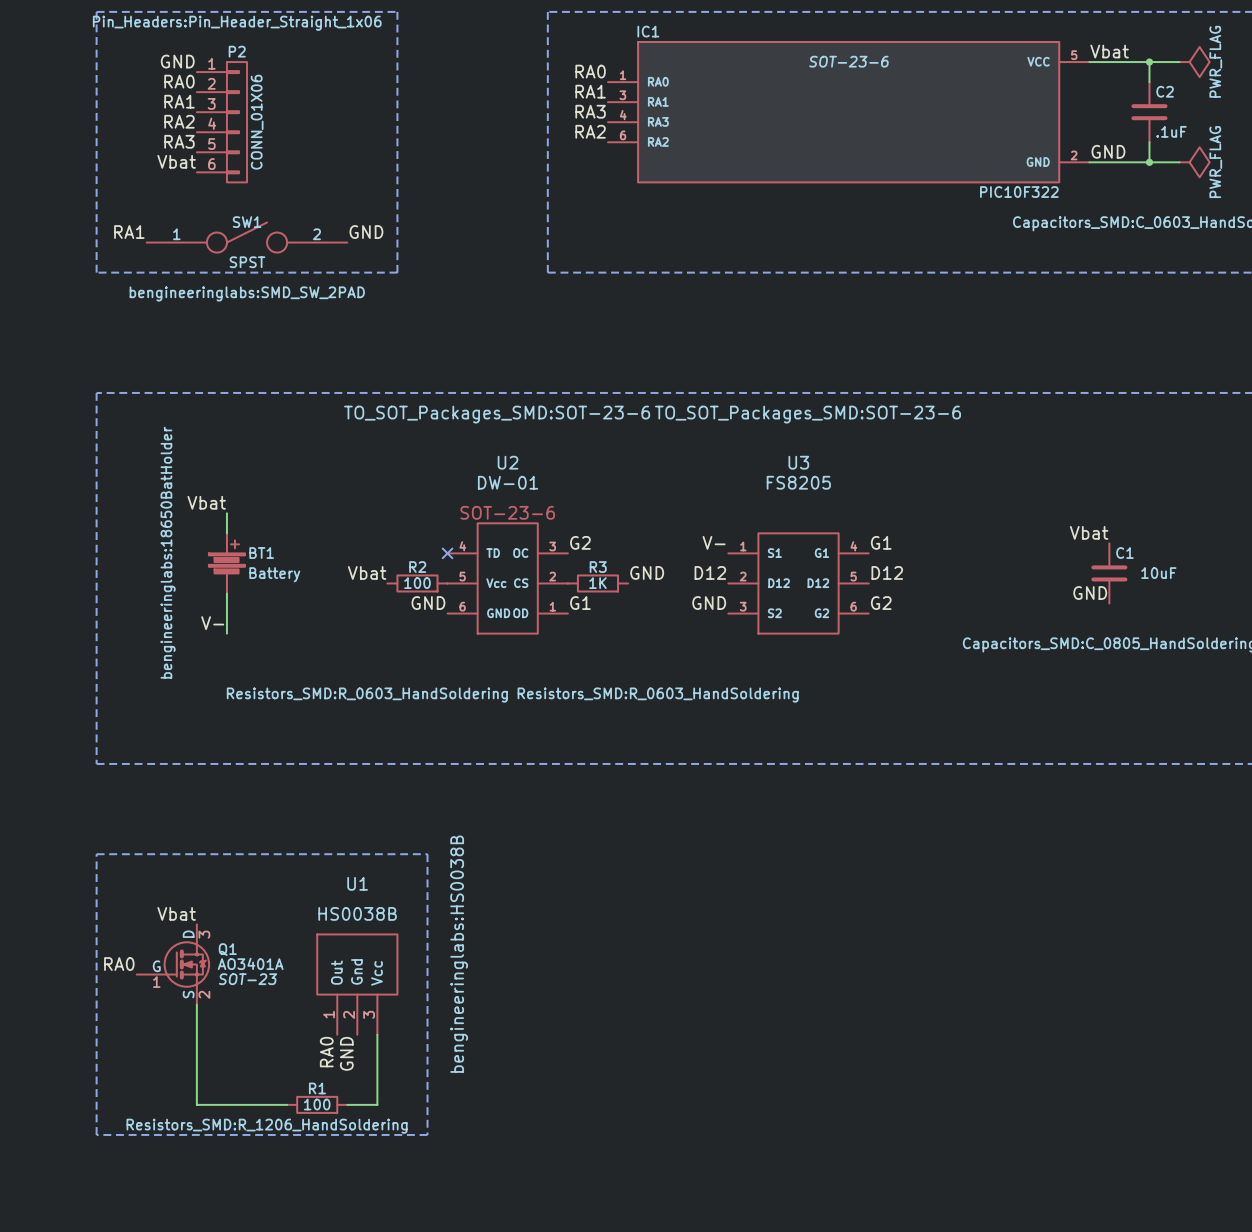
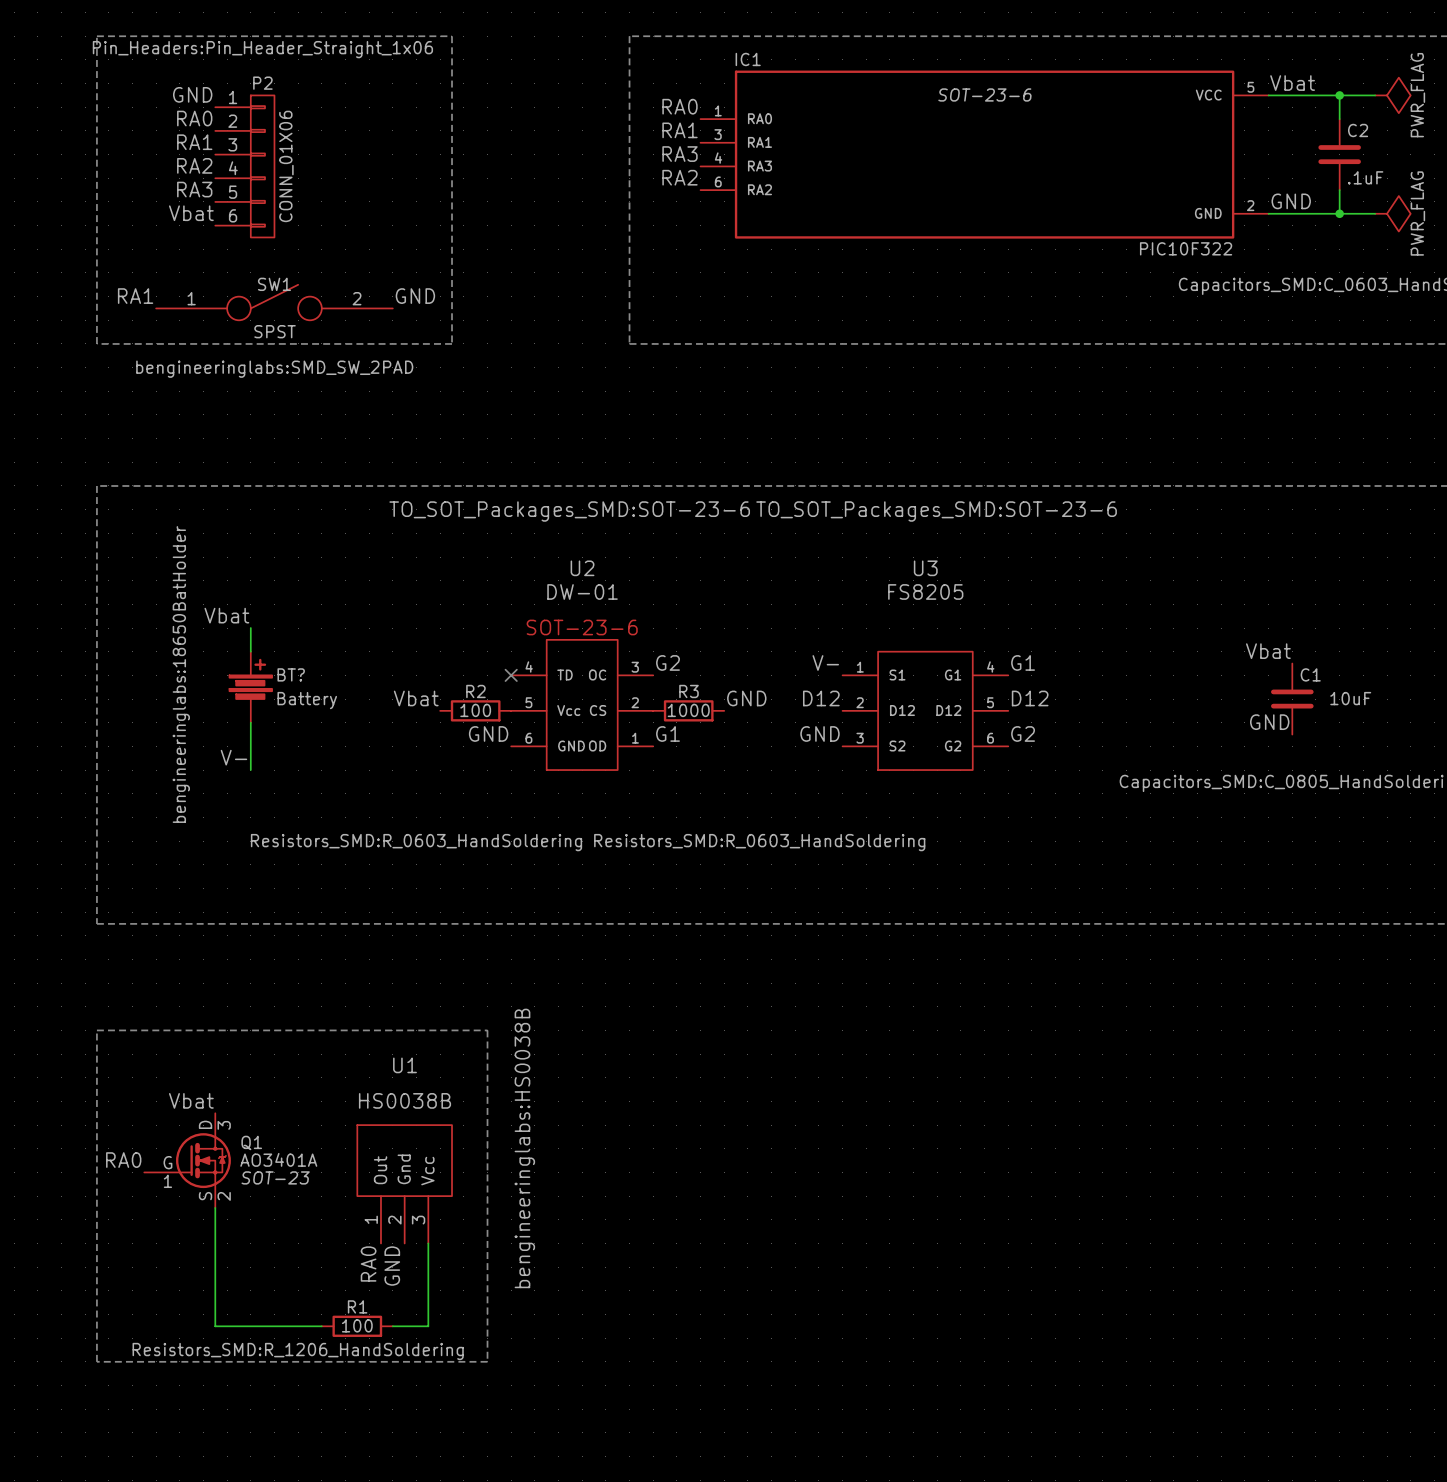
BT1 name: BT1 (261, 553) -> BT? (291, 674)
R3 value: 1K (597, 583) -> 1000 (688, 710)

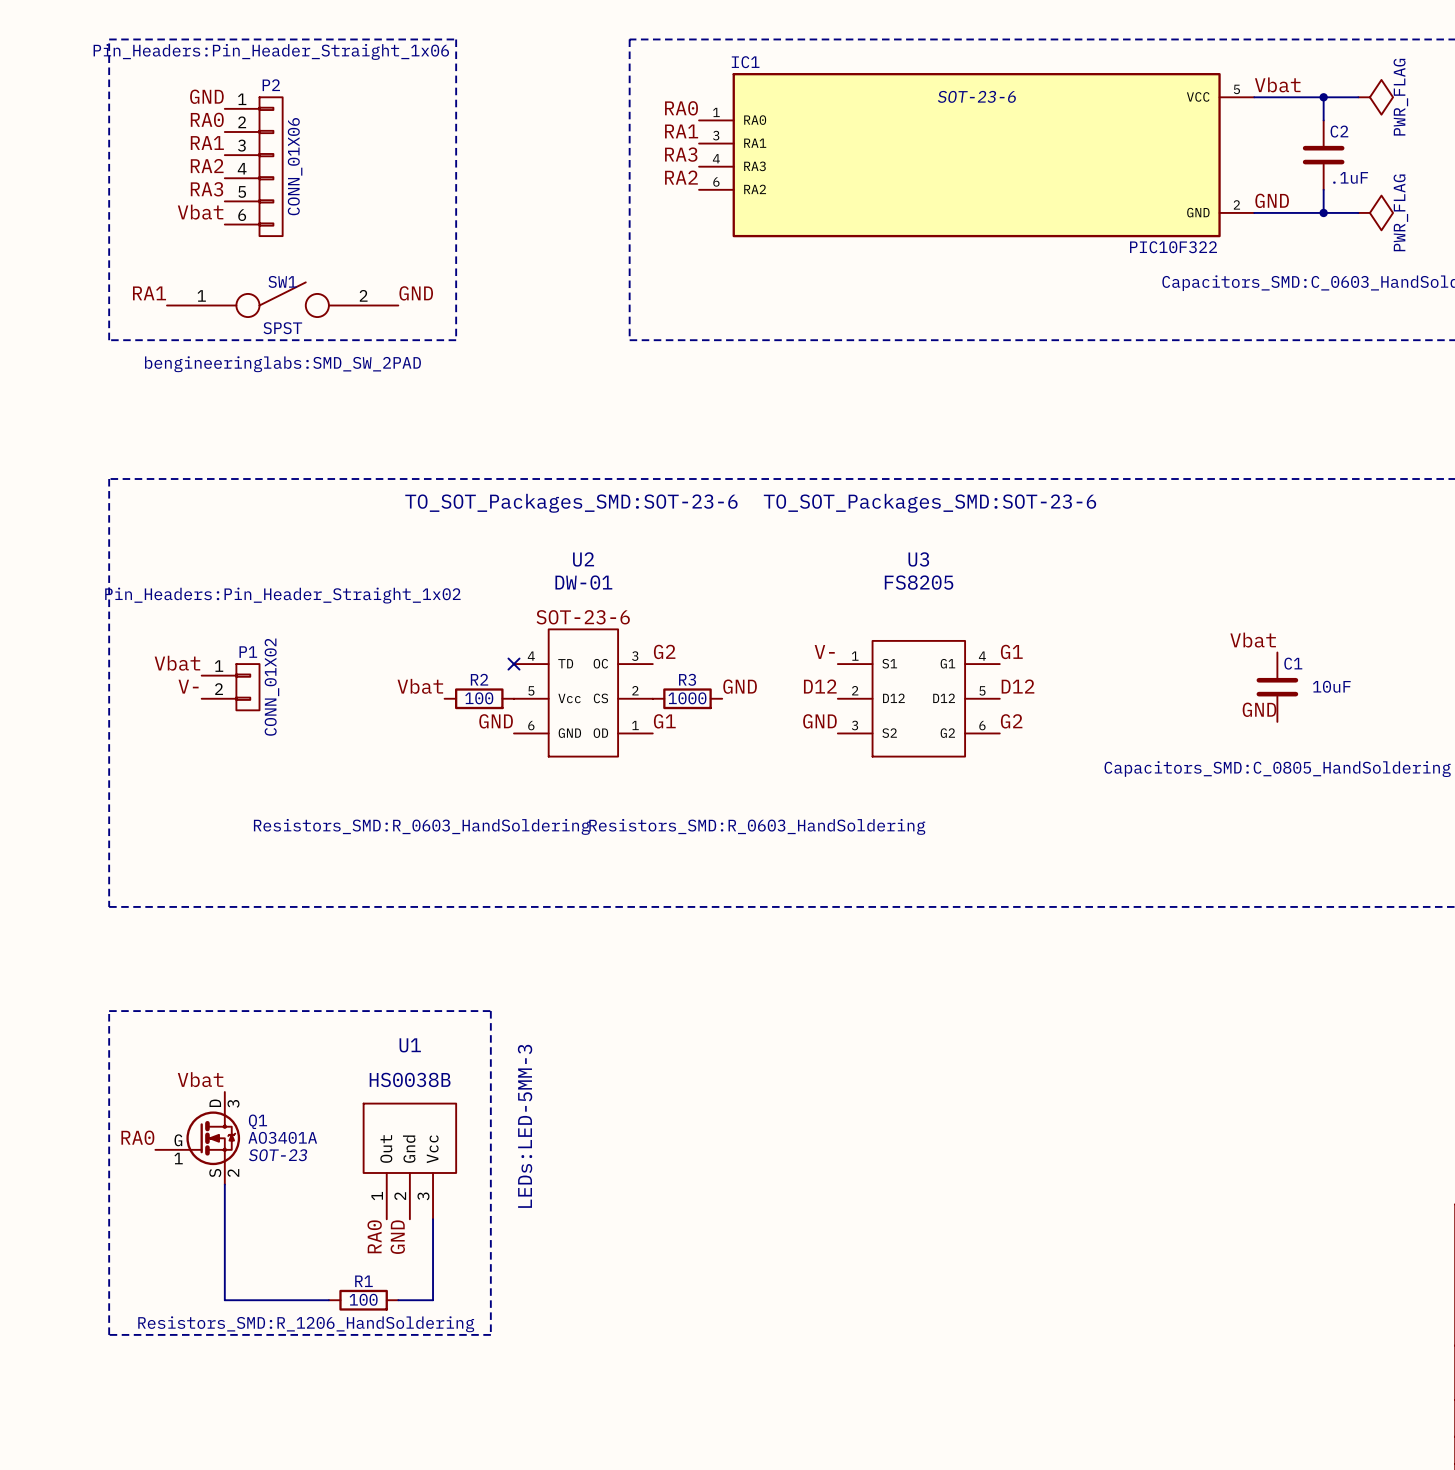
label position: Vbat (226, 615) -> Vbat (177, 663)
wire: (250, 628) (250, 651) -> none
BT?: Battery (250, 687) -> none
P1: none -> CONN_01X02 (230, 687)
wire: (250, 722) (250, 770) -> none
label position: V- (233, 757) -> V- (188, 686)
U1 text: bengineeringlabs:HS0038B (524, 1148) -> LEDs:LED-5MM-3 (525, 1126)

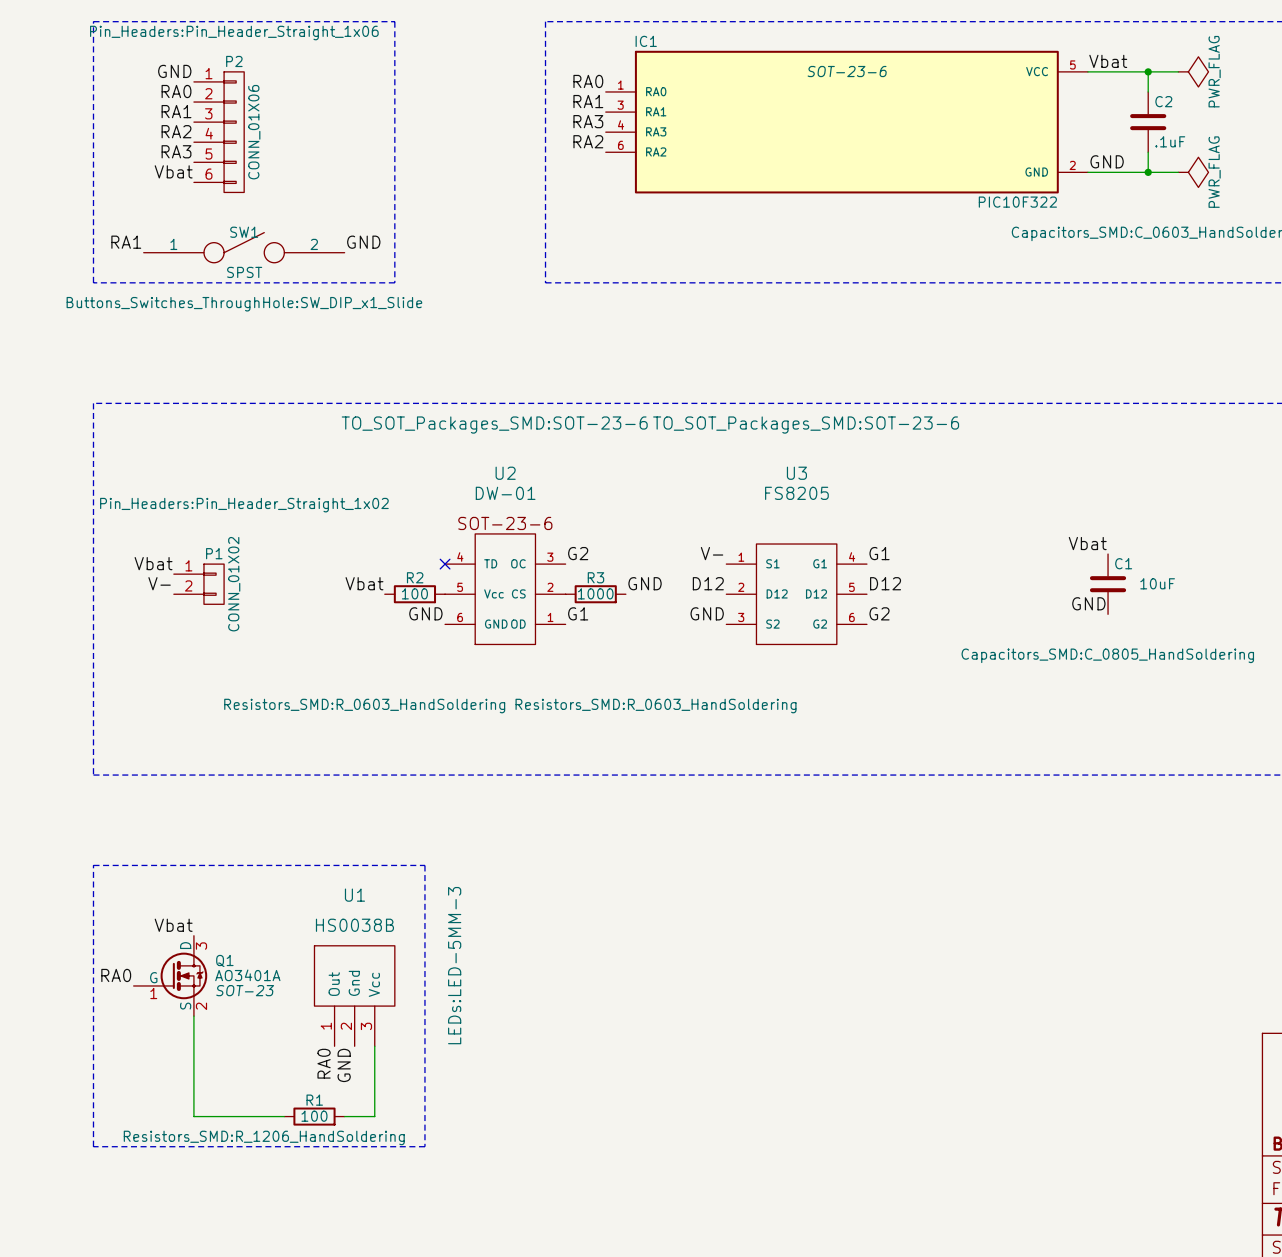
SW1 text: bengineeringlabs:SMD_SW_2PAD (282, 364) -> Buttons_Switches_ThroughHole:SW_DIP_x1_Slide (244, 304)

